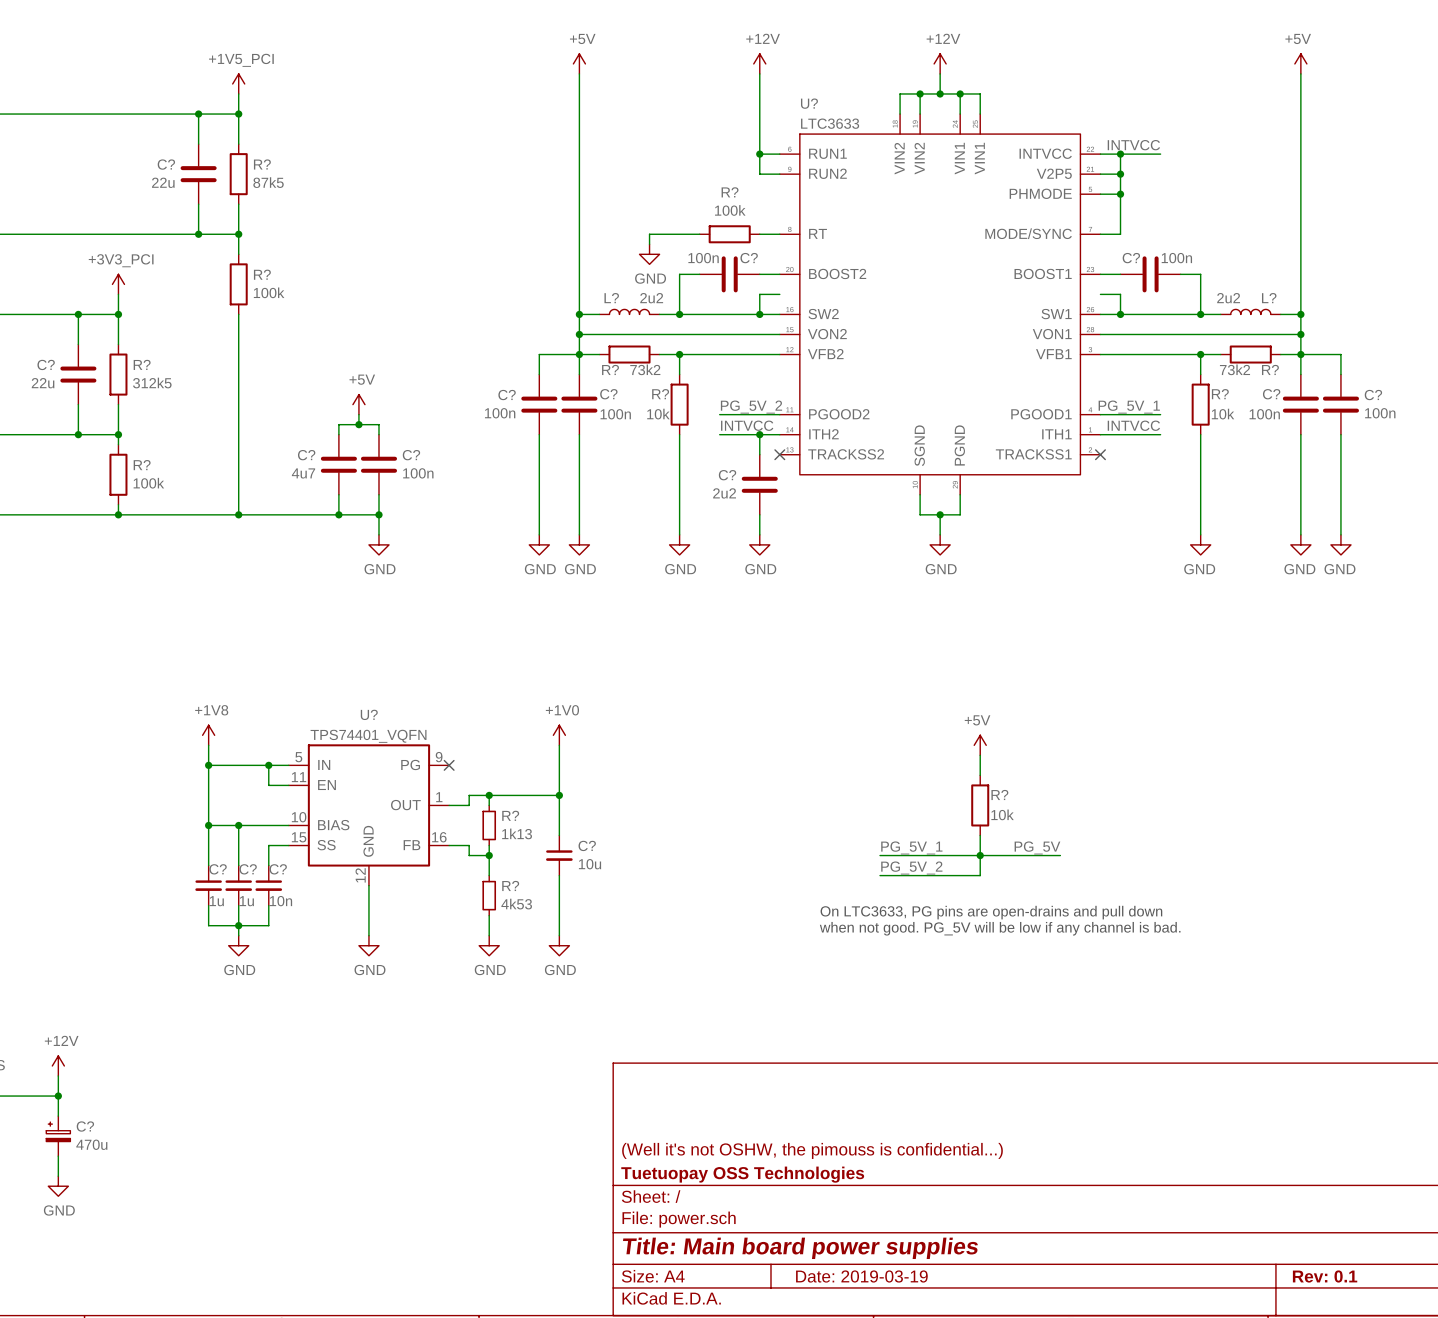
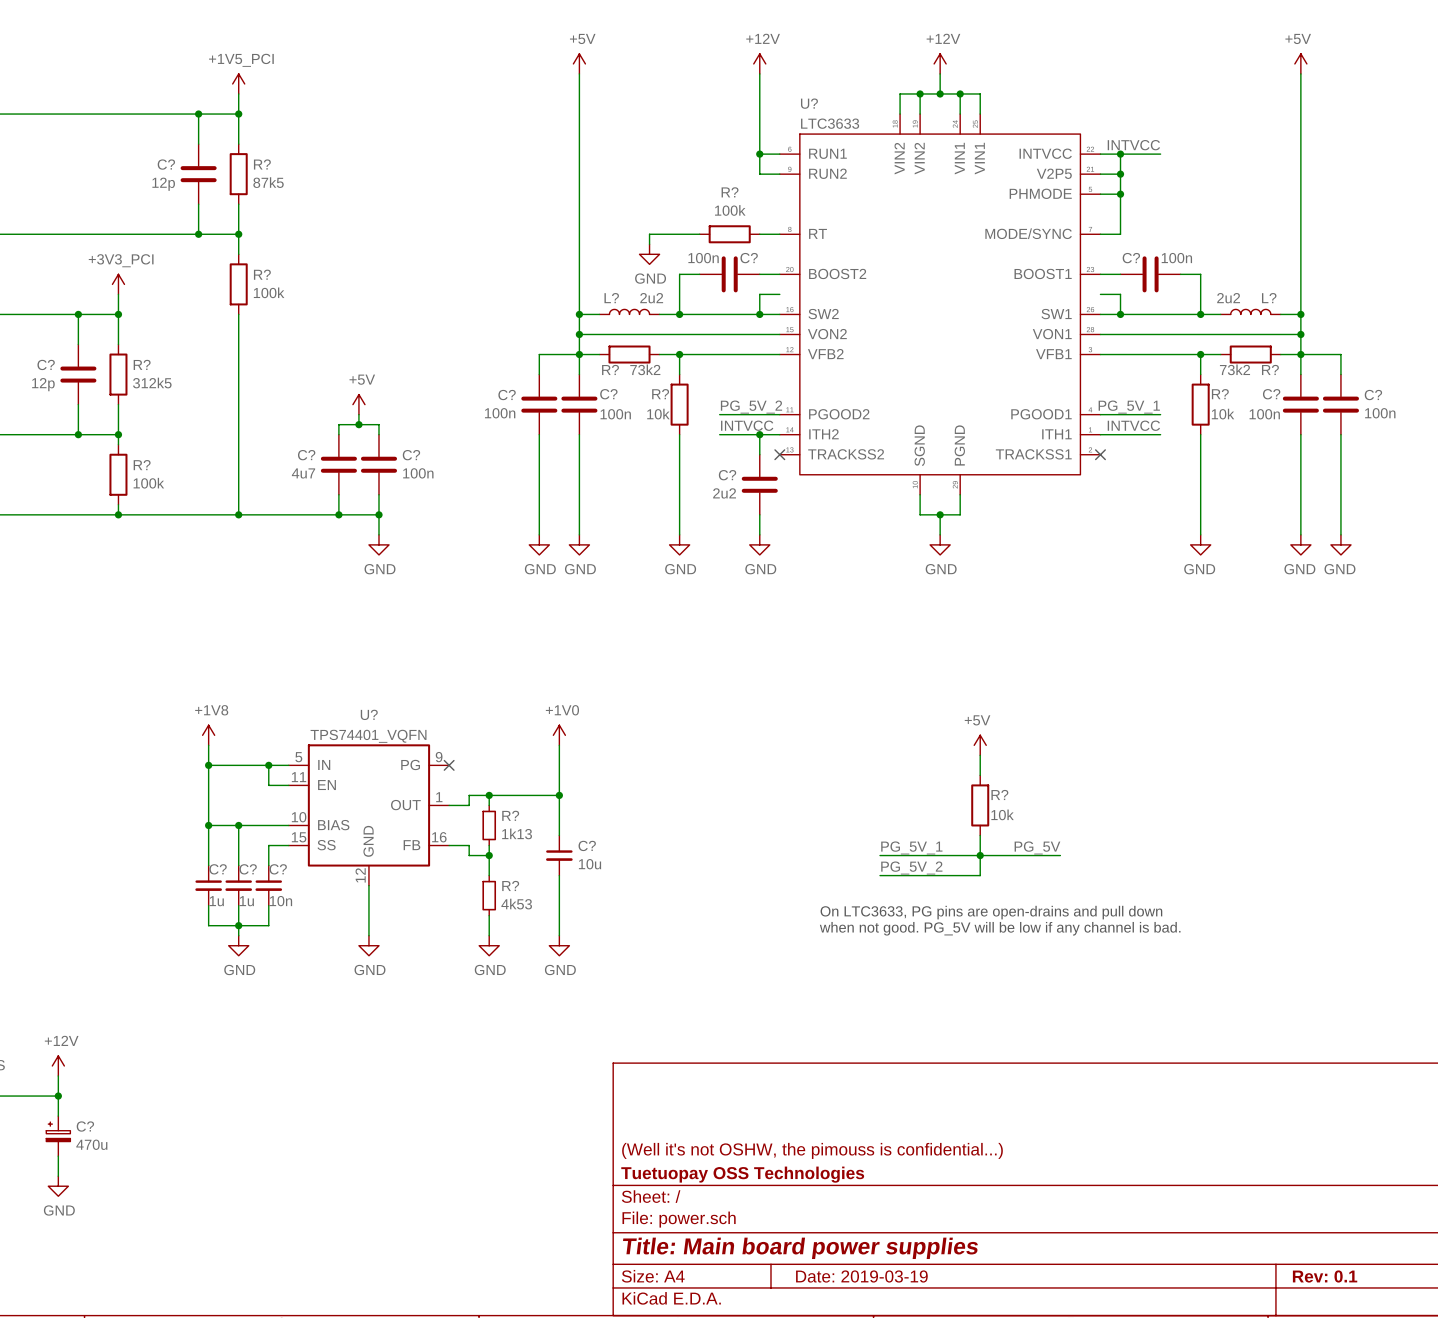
C? value: 22u (163, 182) -> 12p (163, 184)
C? value: 22u (43, 383) -> 12p (43, 384)

